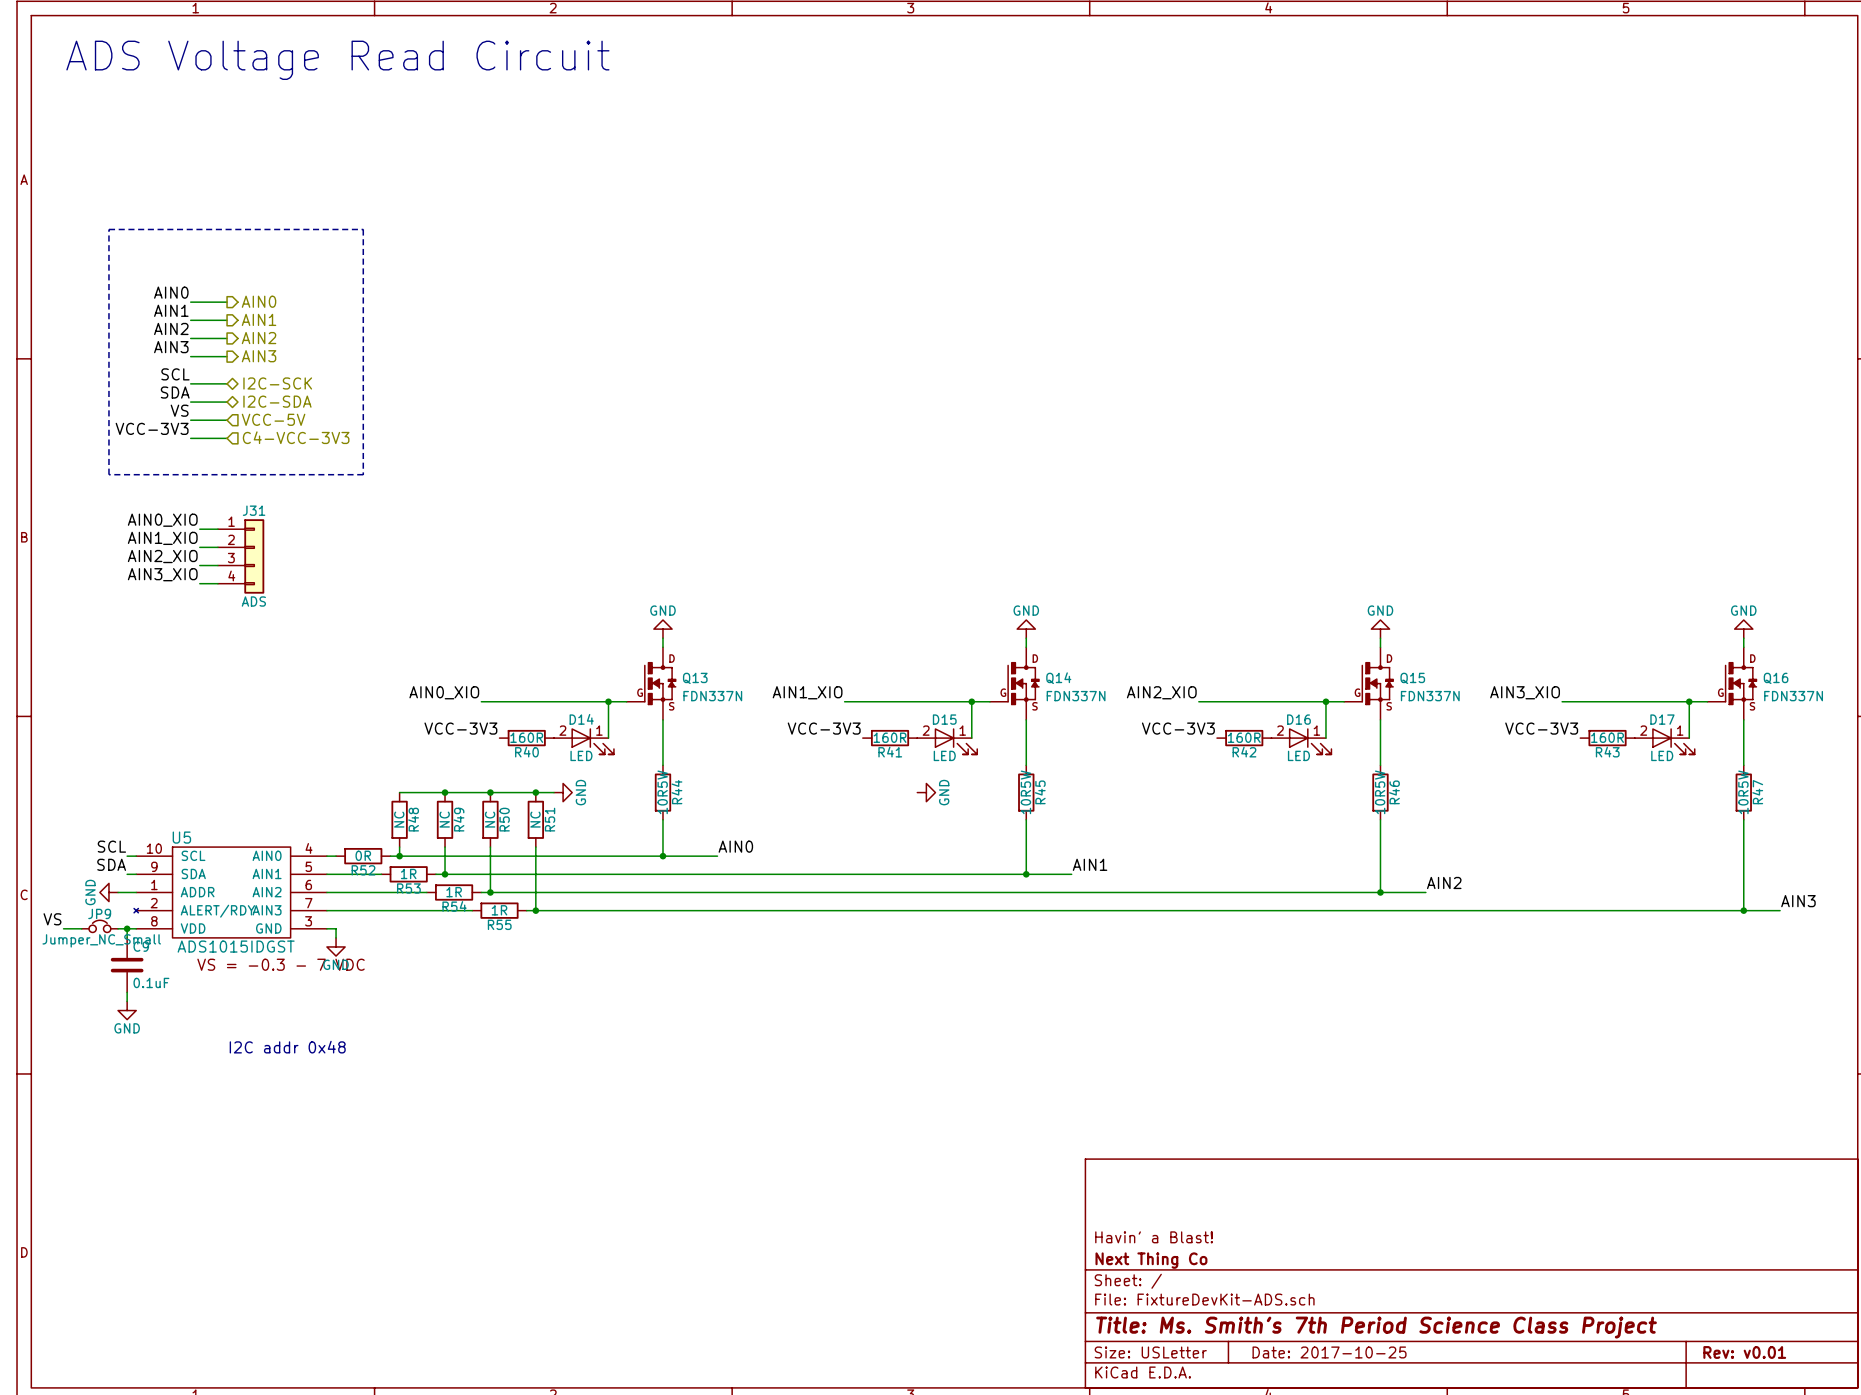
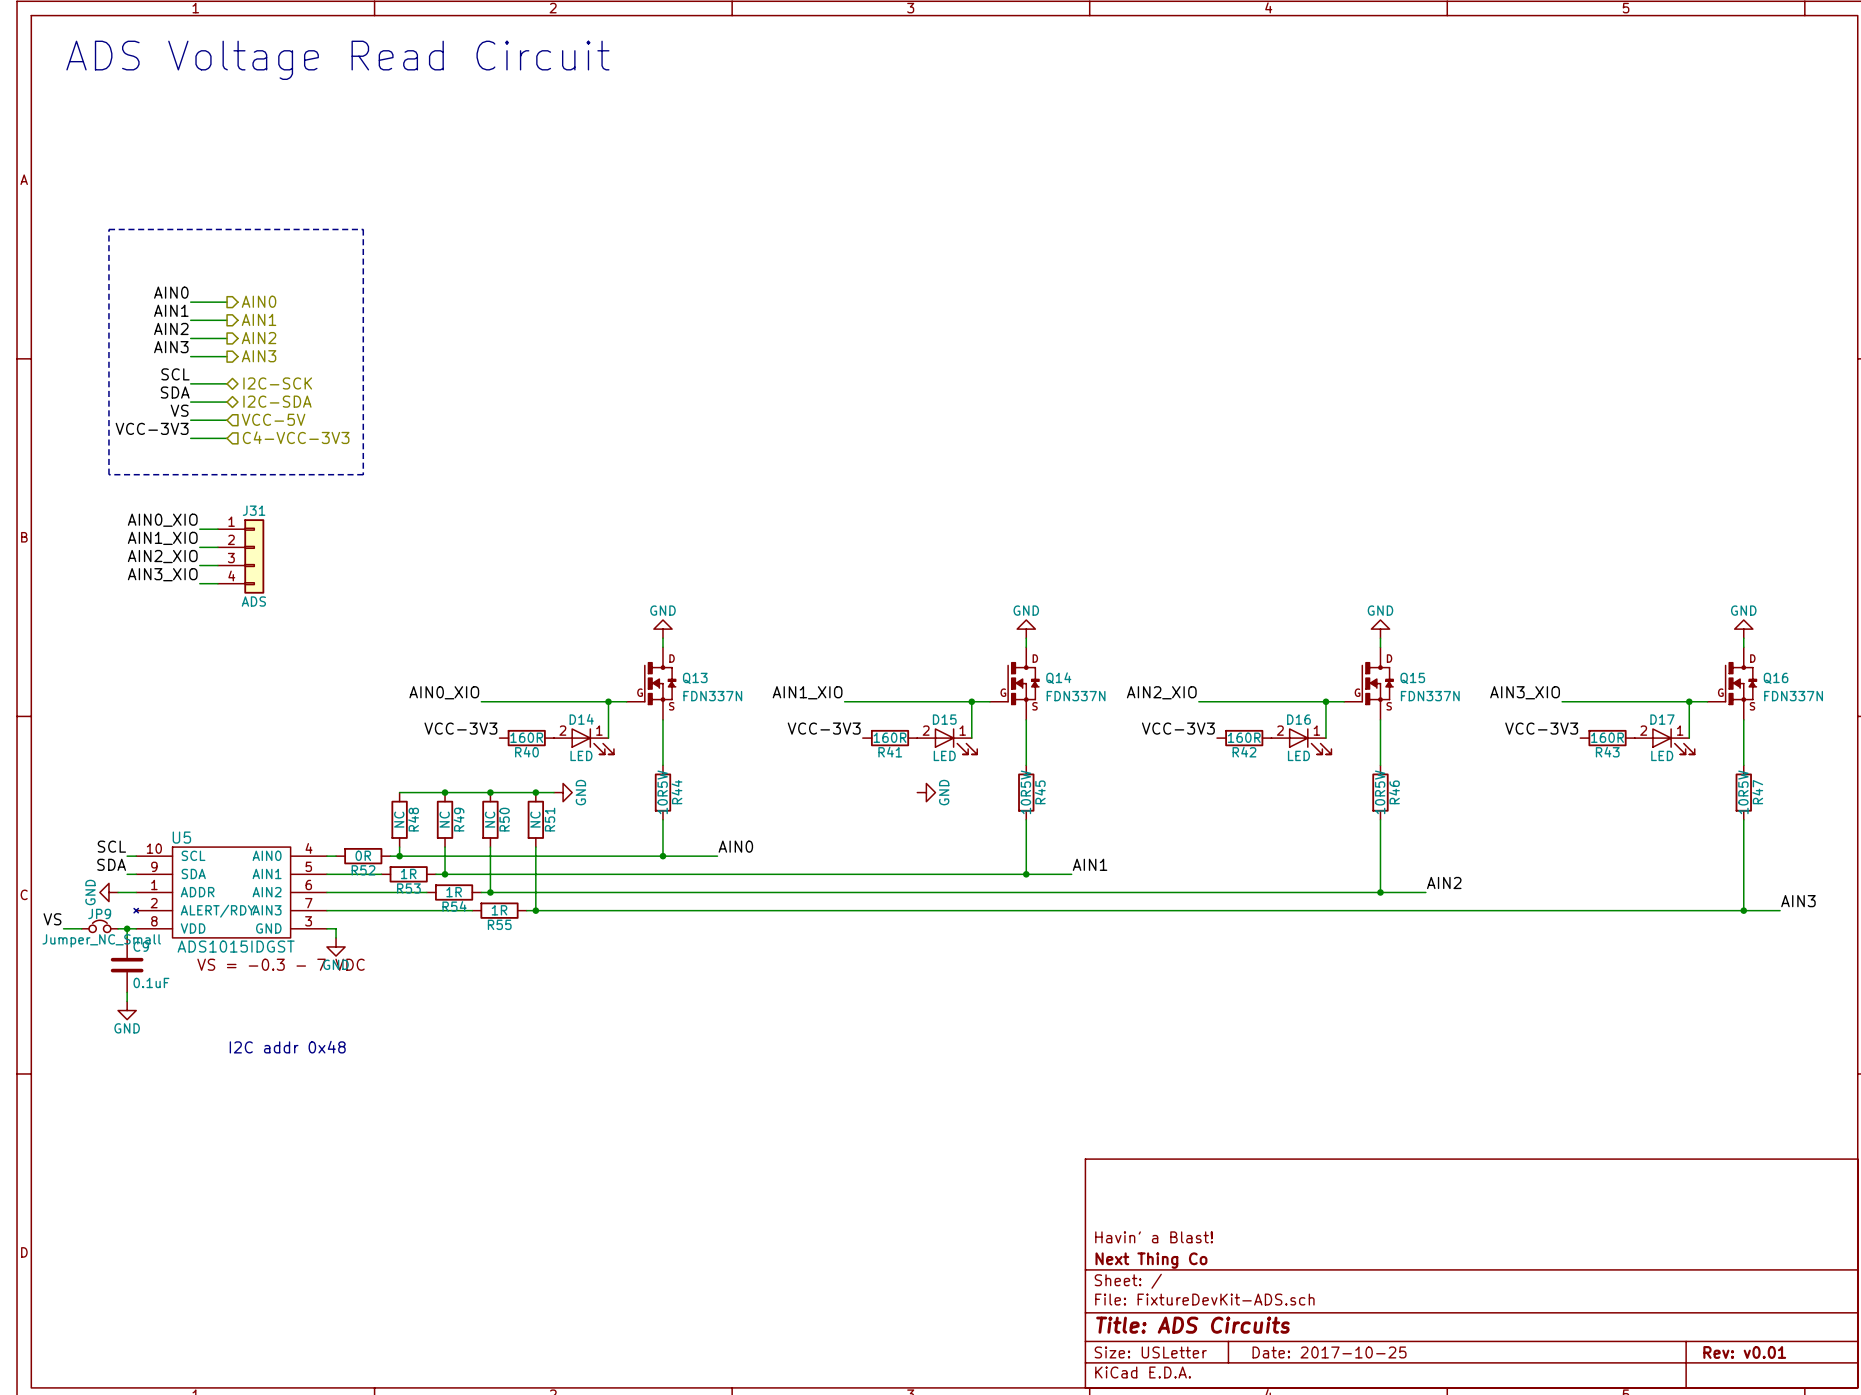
title block: Title: Ms. Smith's 7th Period Science Class Project (1376, 1327) -> Title: ADS Circuits (1192, 1325)

